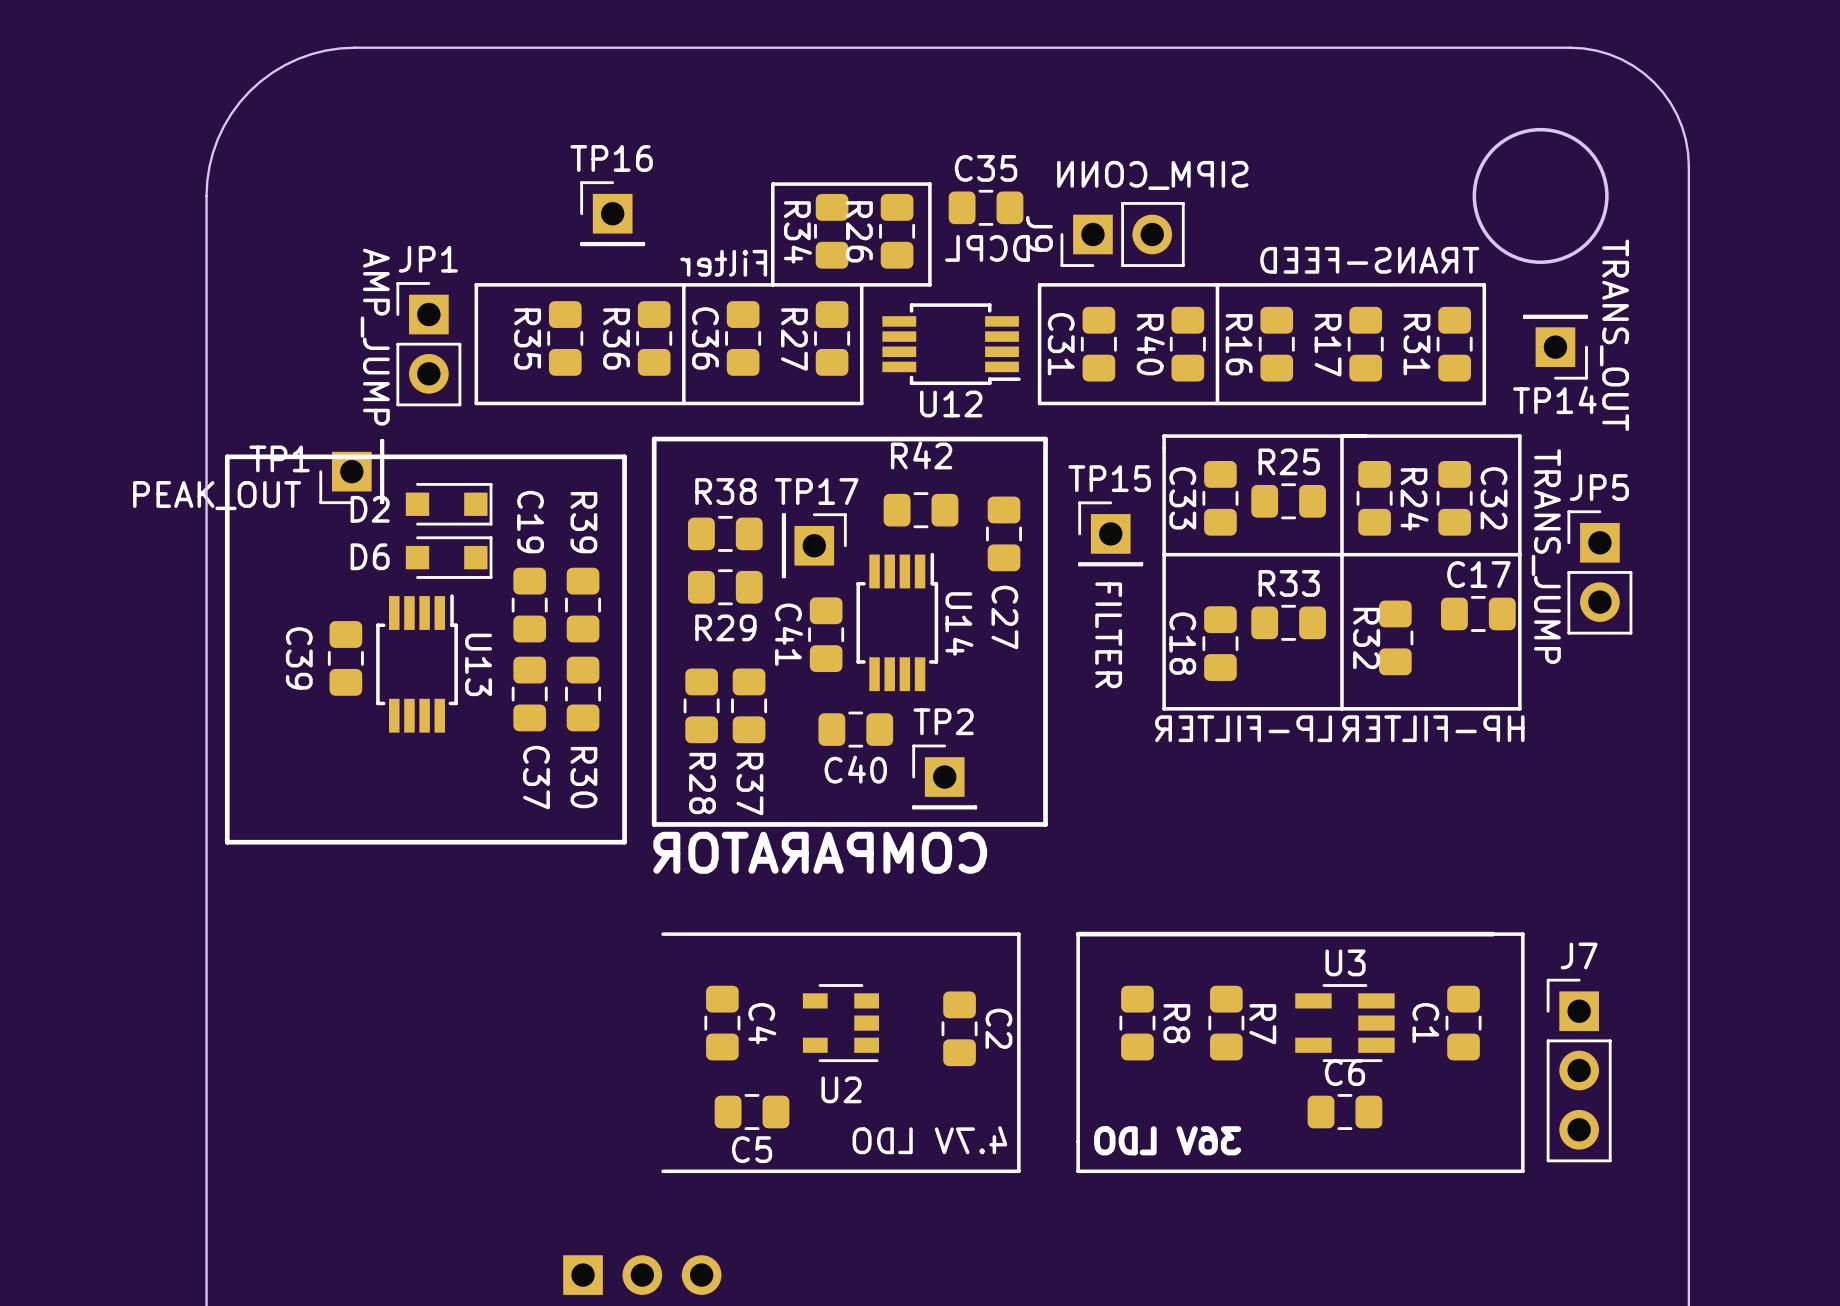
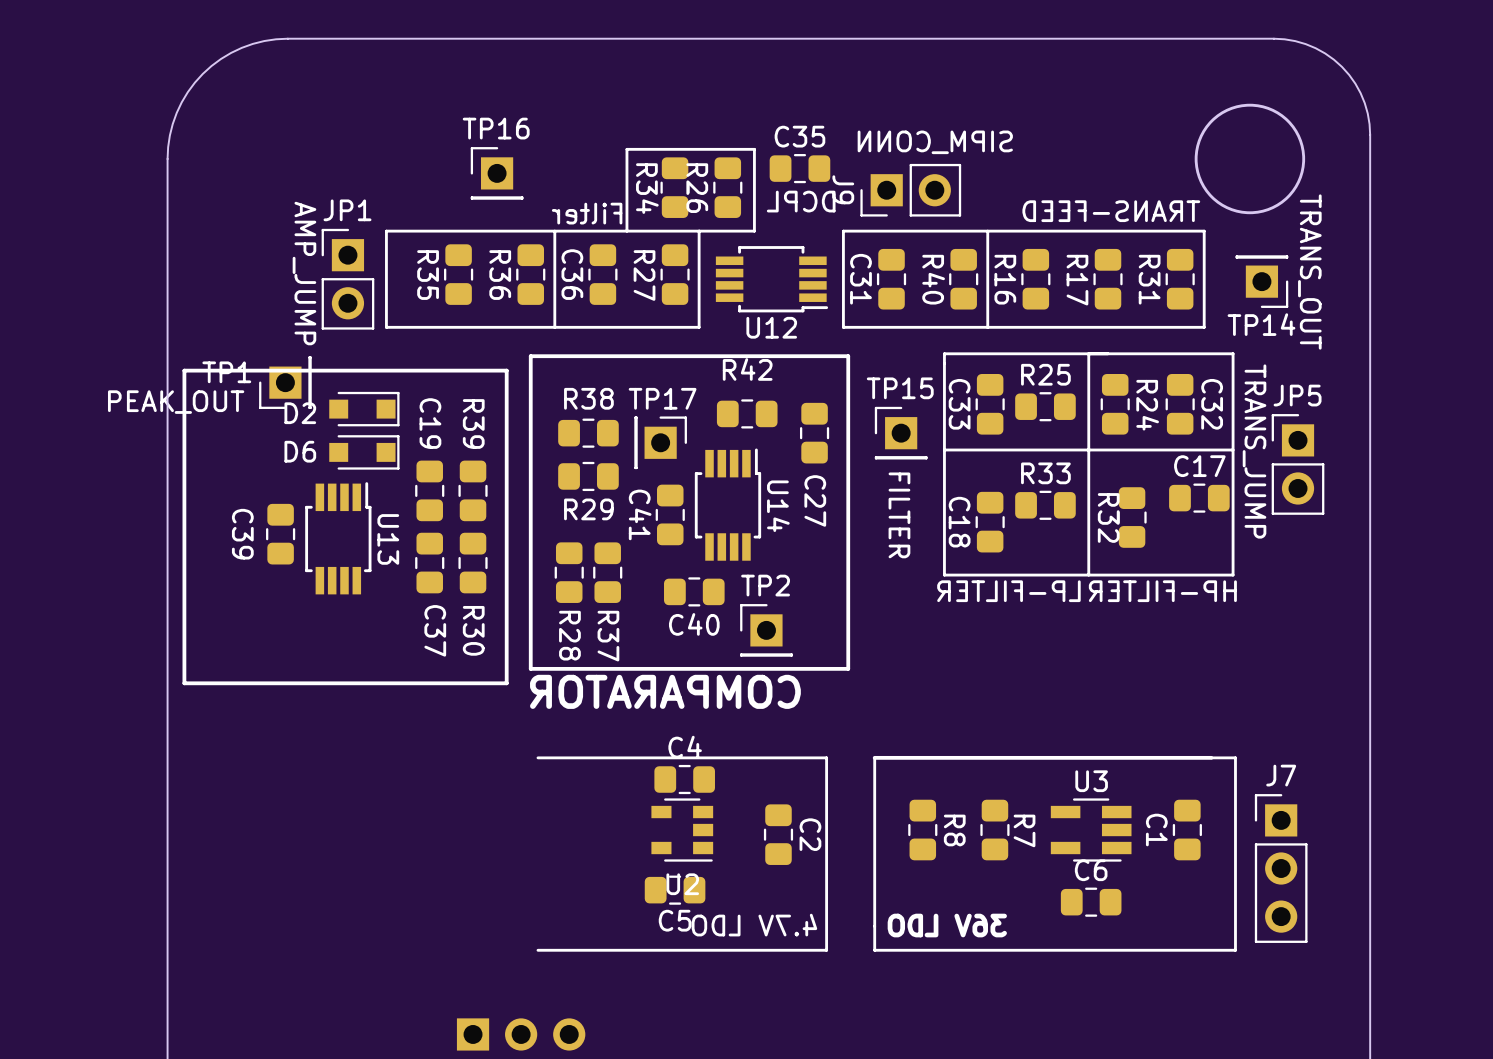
C4 rotation: 0° (722, 1023) -> 90° clockwise (684, 779)
C4 position: (722, 1023) -> (684, 779)
C4 name position: C4 (762, 1023) -> C4 (685, 747)
C5 position: (752, 1112) -> (675, 890)

